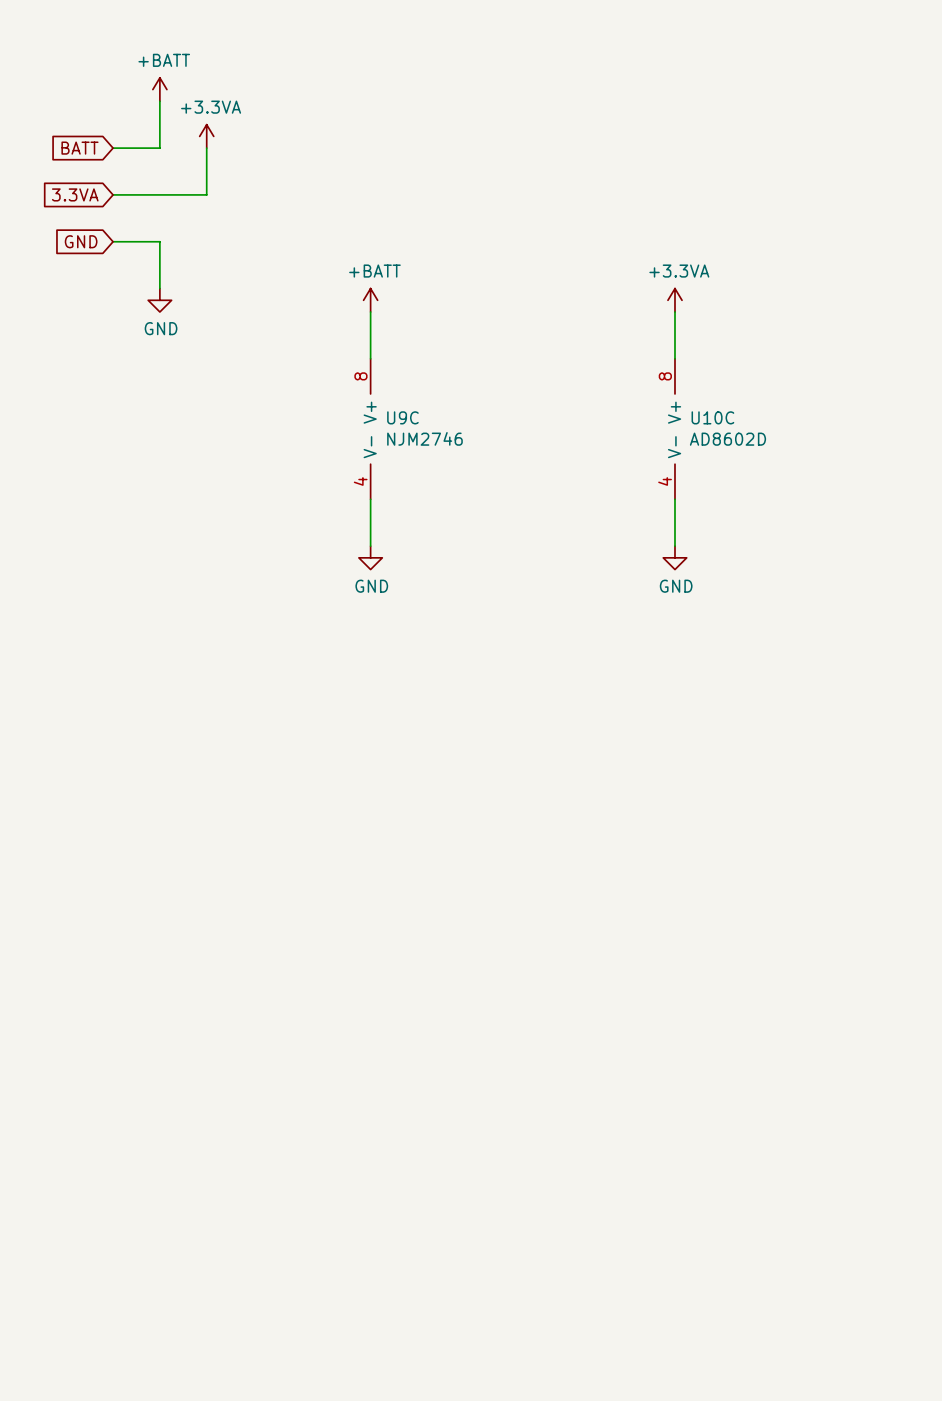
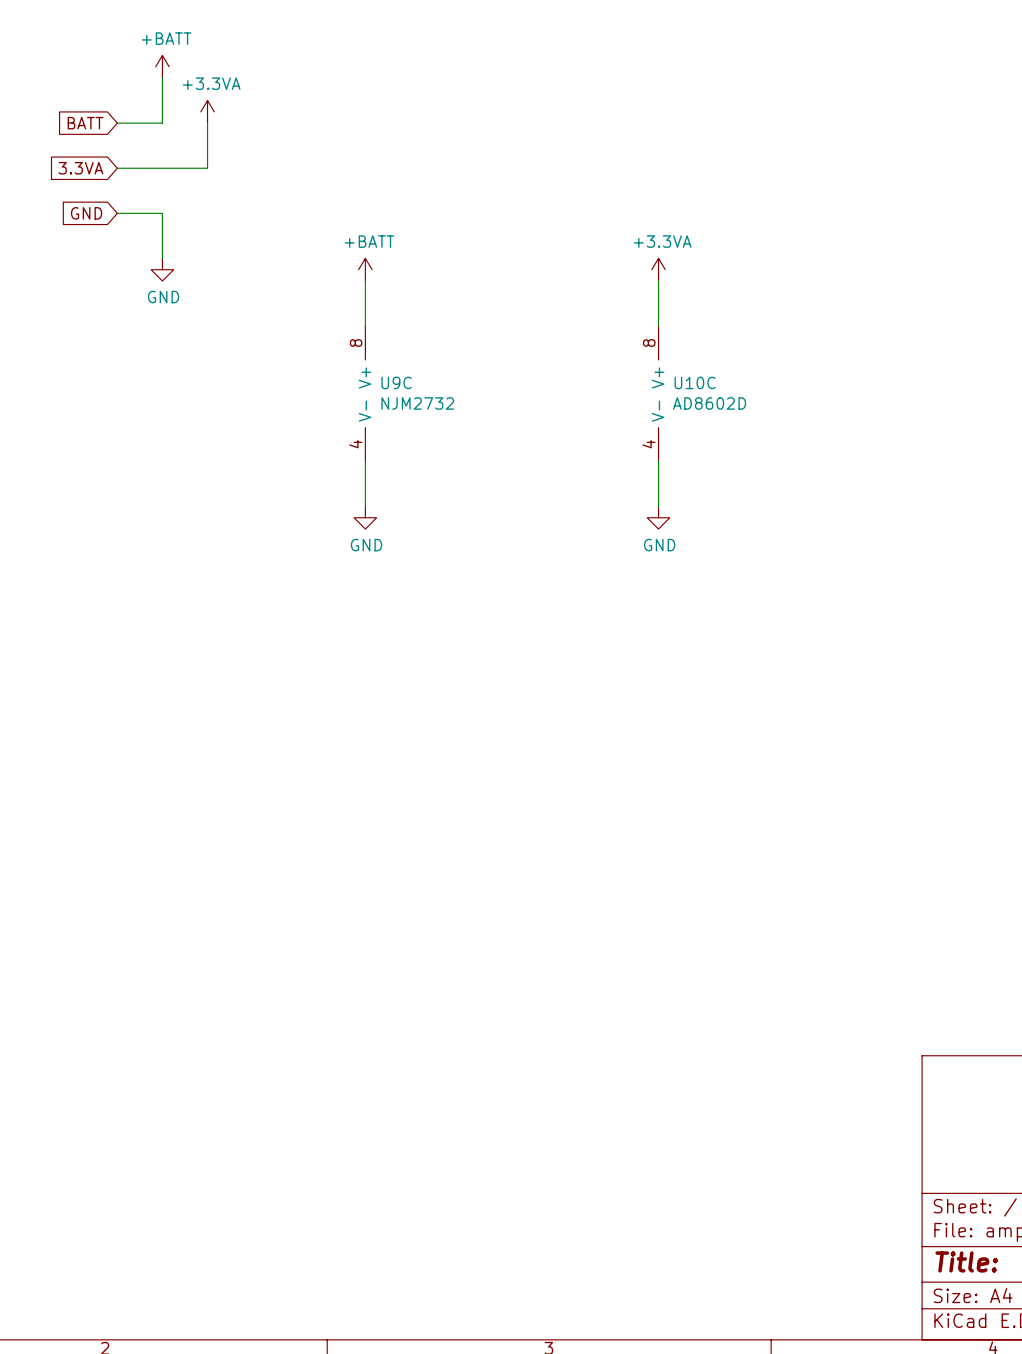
U9C value: NJM2746 (424, 438) -> NJM2732 (417, 403)

